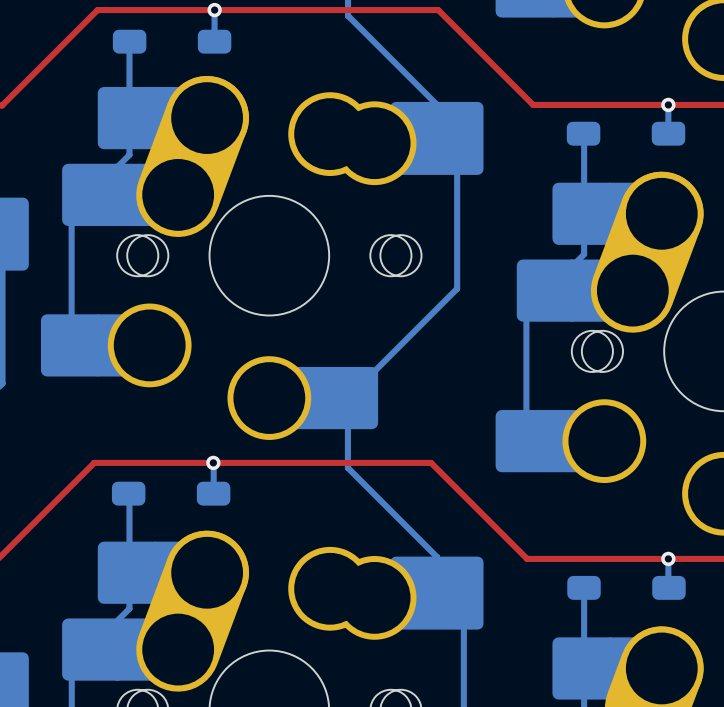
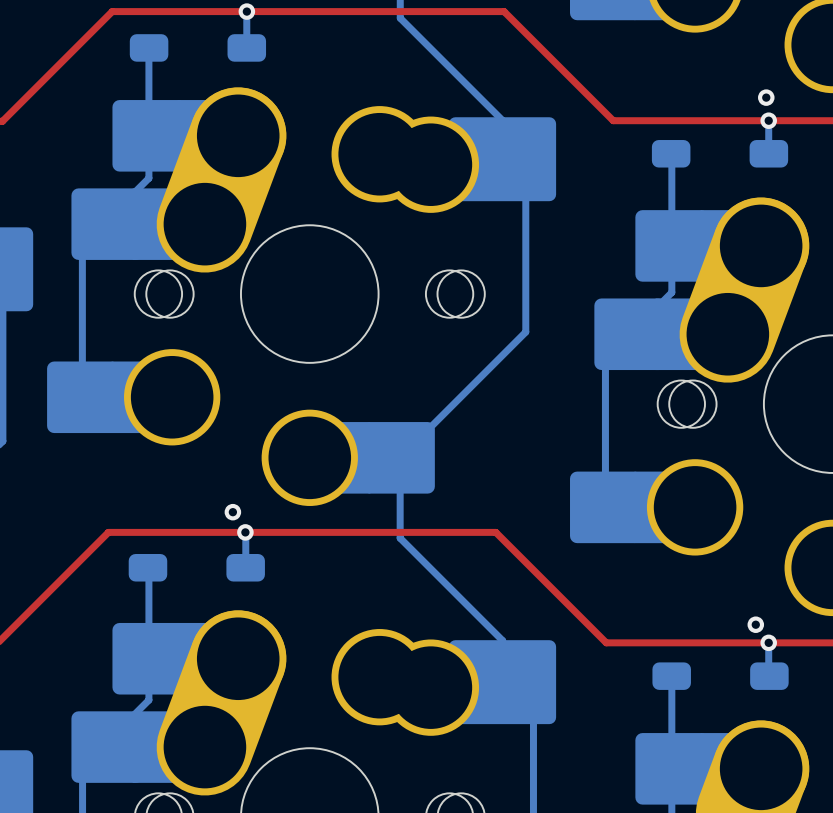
via: none -> (766, 97)
via: none -> (232, 512)
via: none -> (755, 624)

